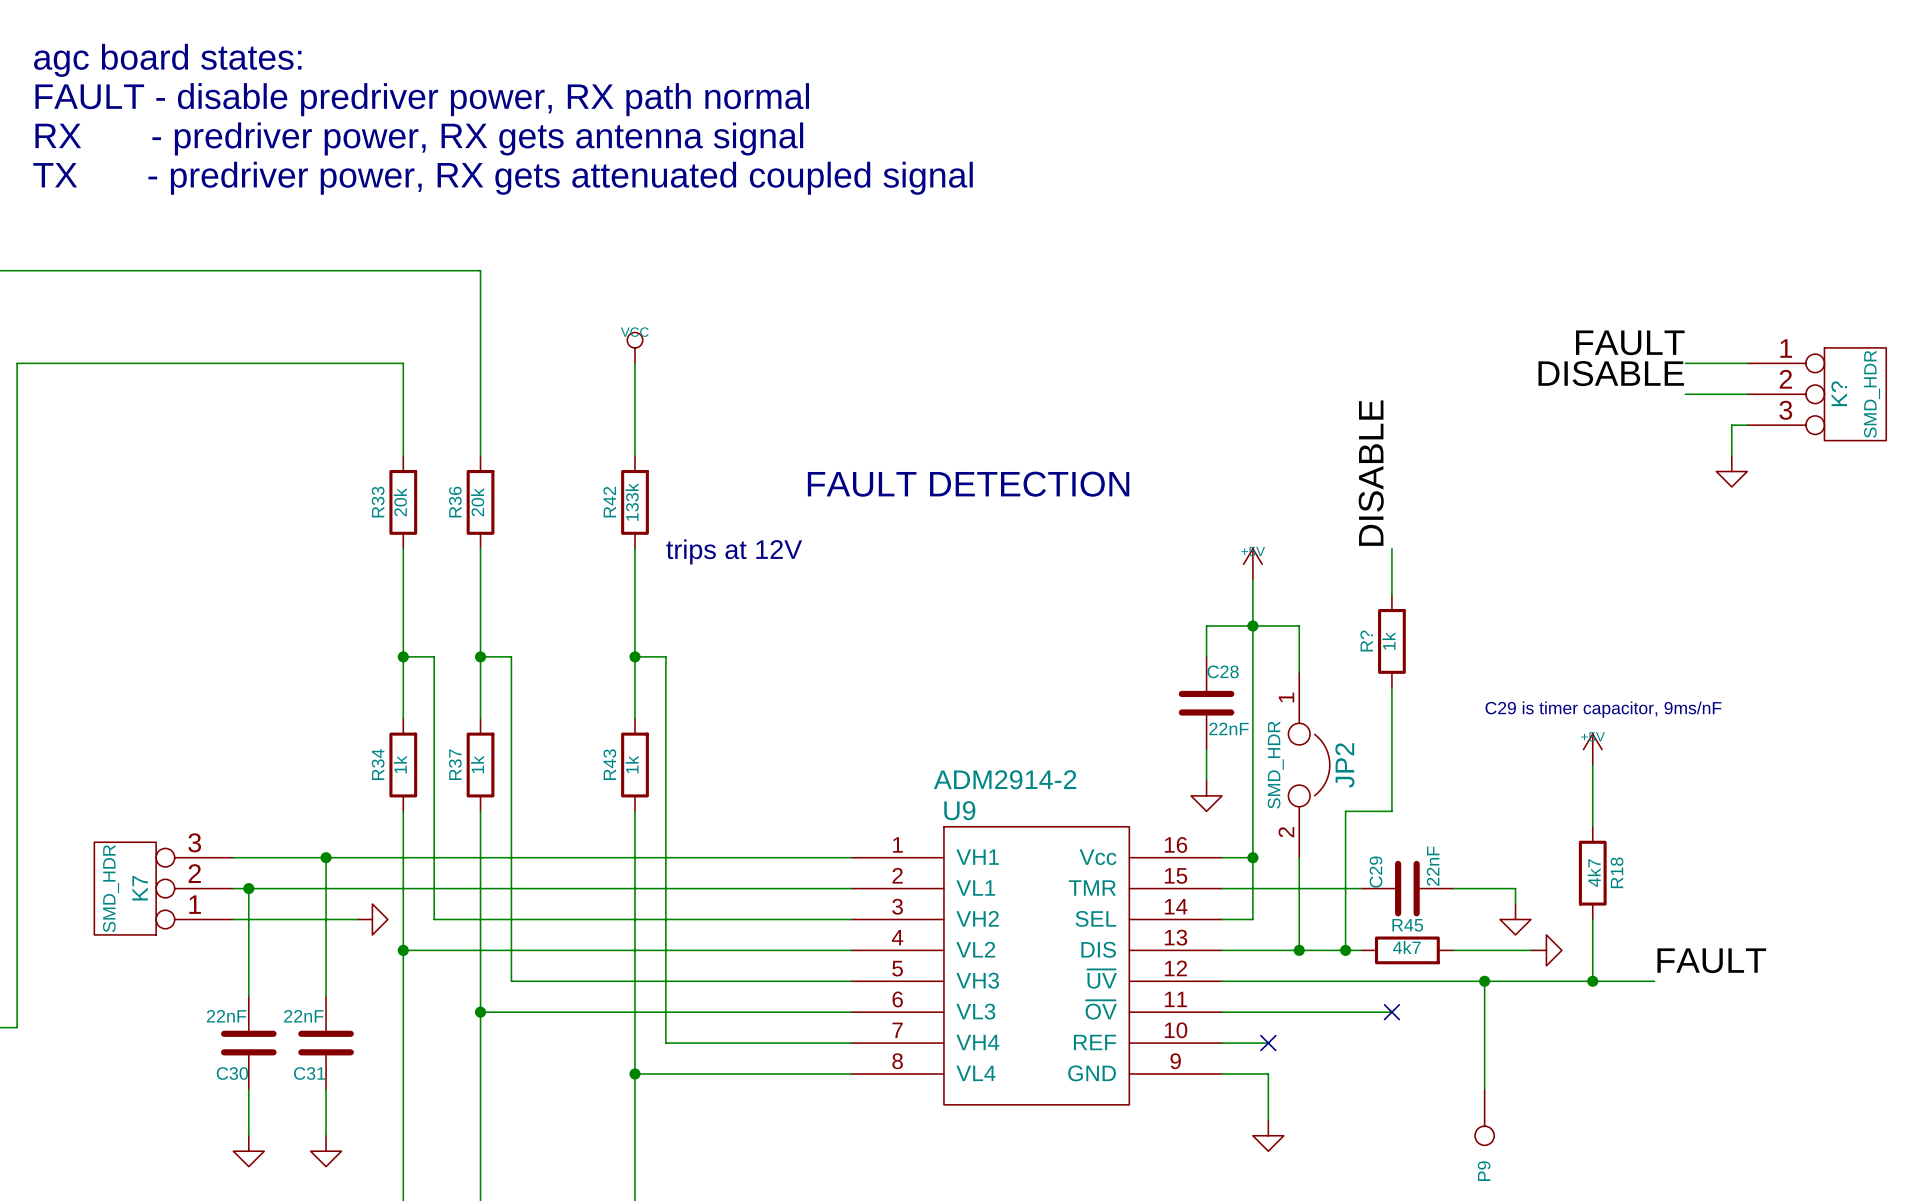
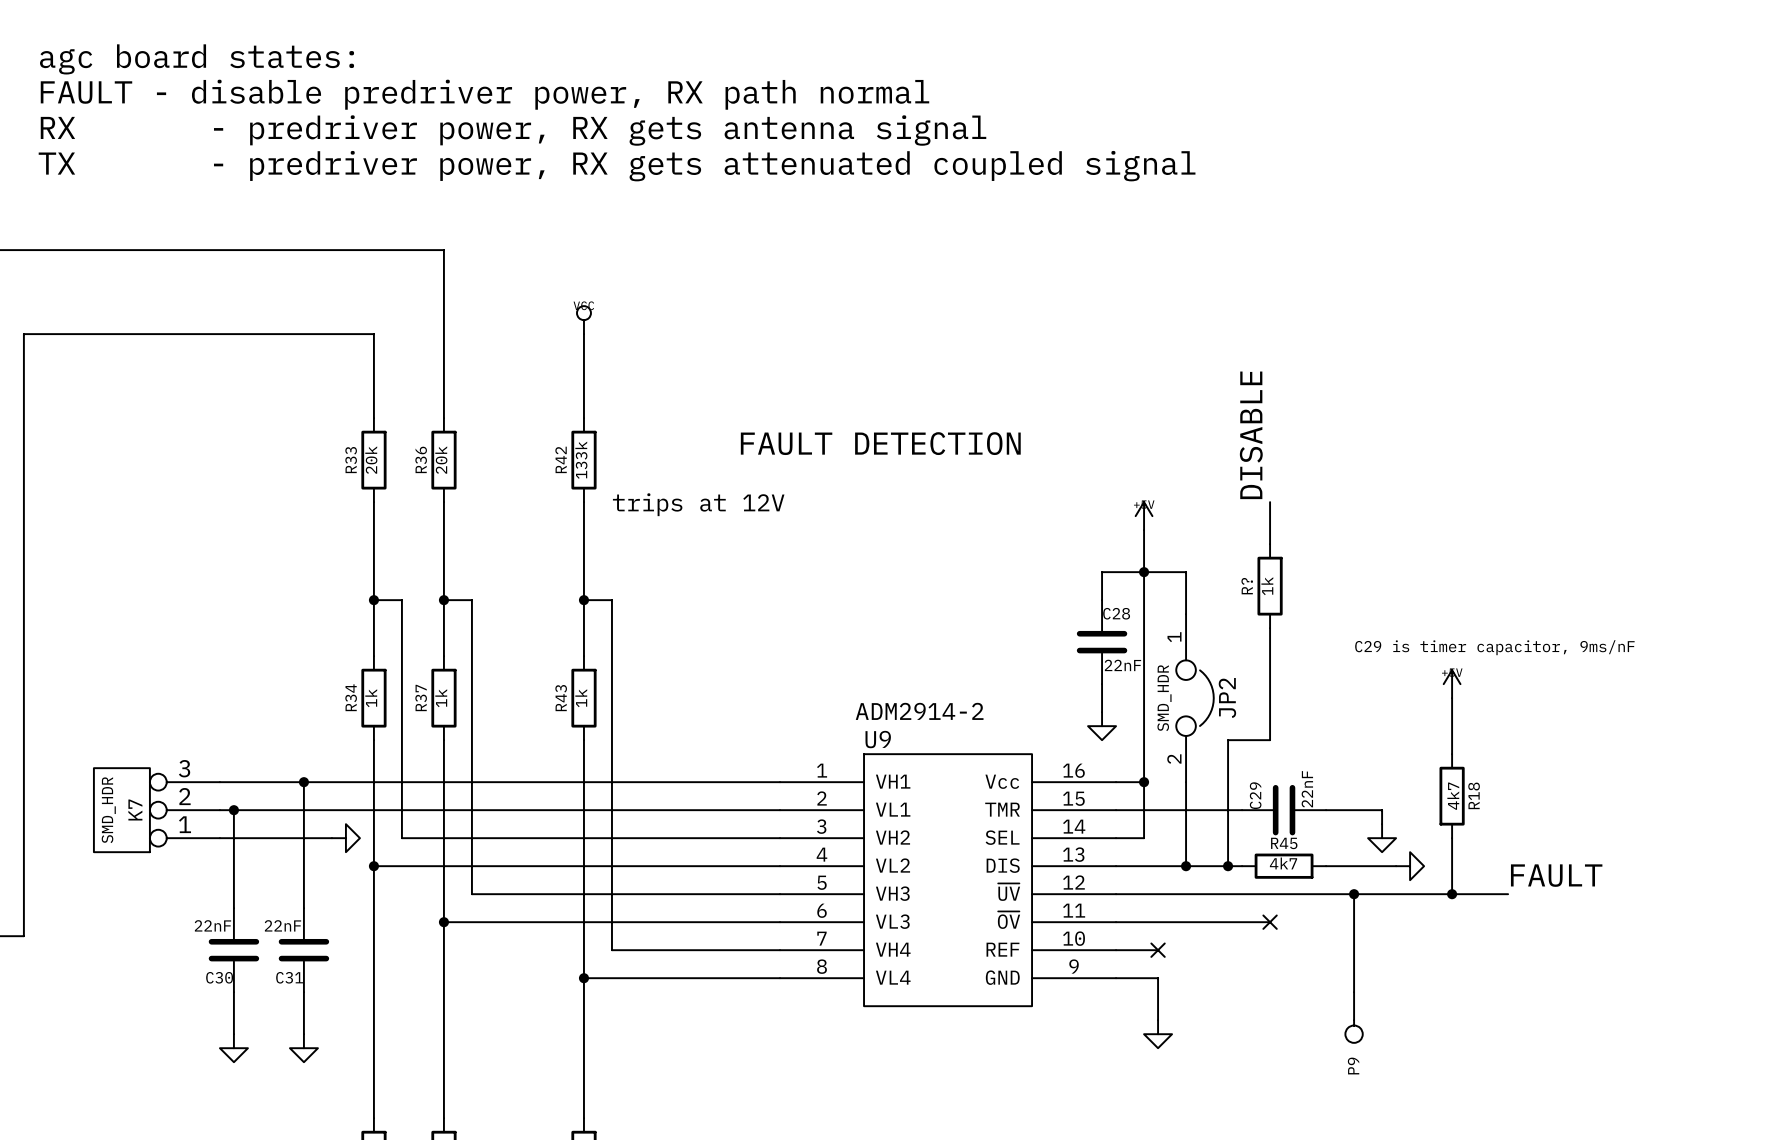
label: FAULT (1630, 342) -> none
wire: (1685, 363) (1747, 363) -> none
label: DISABLE (1611, 373) -> none
wire: (1685, 394) (1747, 394) -> none
K?: SMD_HDR (1816, 394) -> none
wire: (1747, 425) (1731, 425) (1731, 456) -> none
power symbol: (1731, 471) -> none

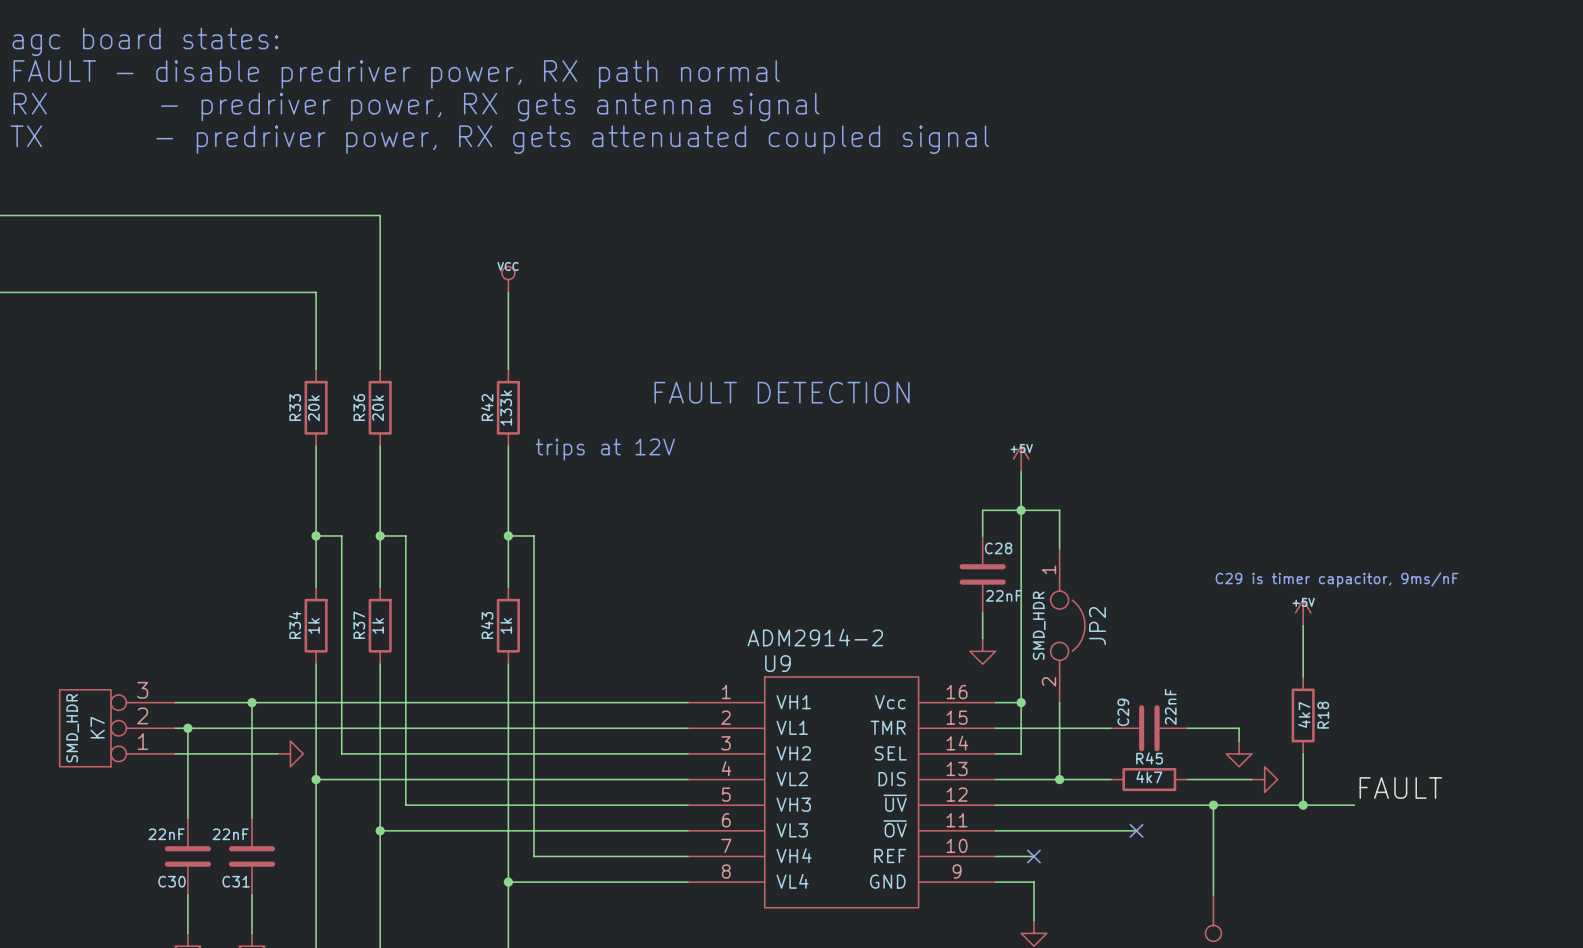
label: DISABLE (1251, 435) -> none
wire: (1270, 502) (1270, 544) -> none
R?: 1k (1270, 586) -> none
wire: (1270, 628) (1270, 740) (1228, 740) (1228, 866) -> none
junction: (1228, 866) -> none

